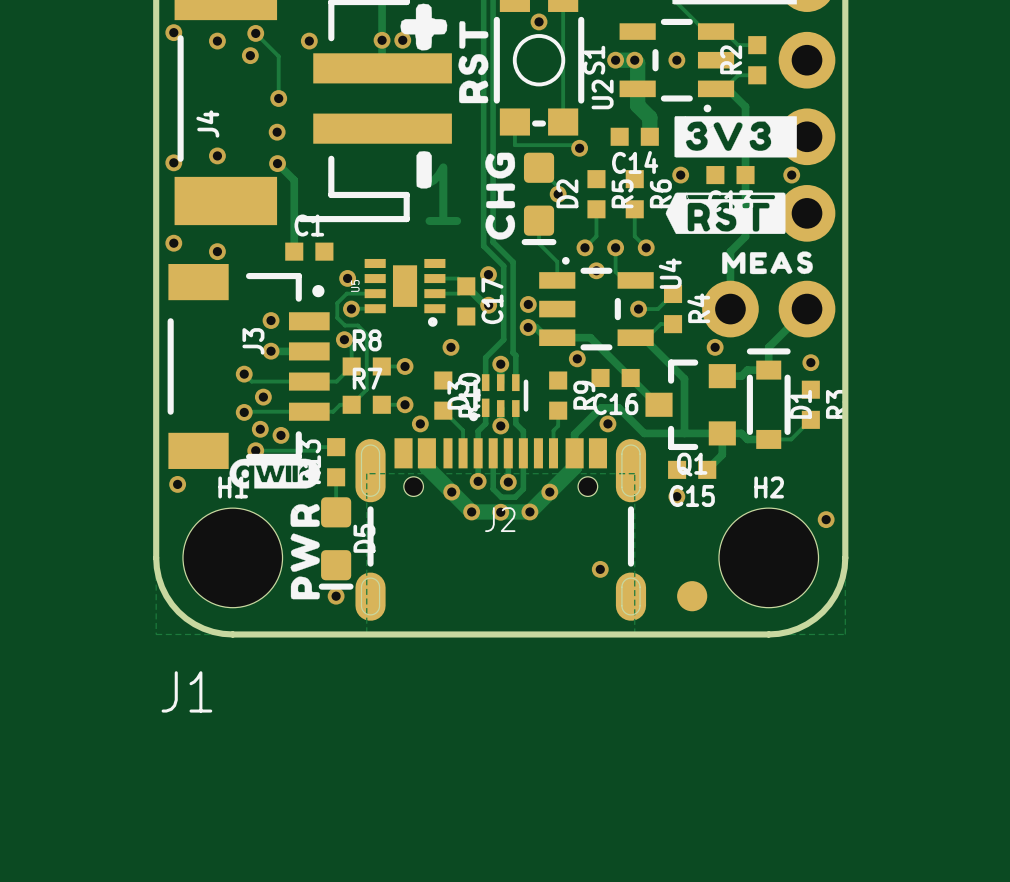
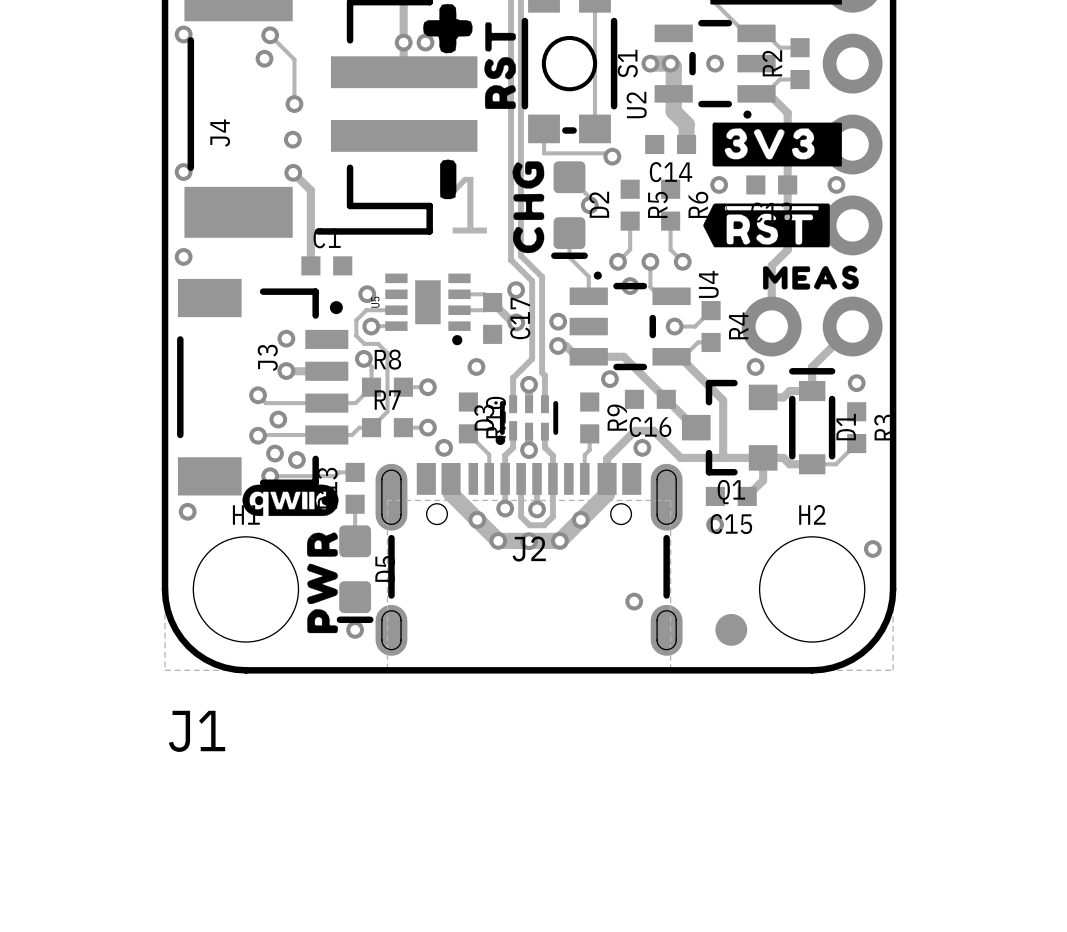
via: (539, 21) -> none
via: (217, 41) -> none
via: (309, 41) -> none
via: (217, 155) -> none
via: (217, 251) -> none

